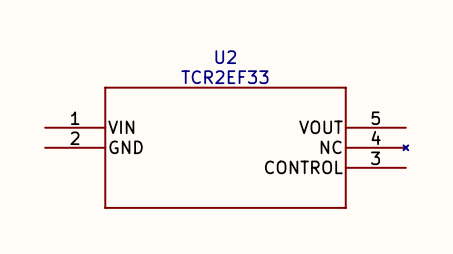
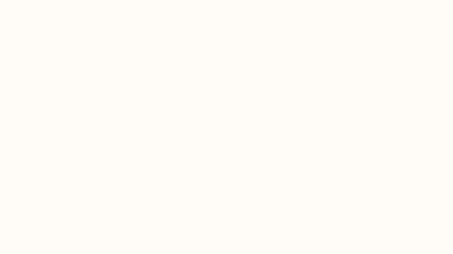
U2: TCR2EF33 (226, 147) -> none

